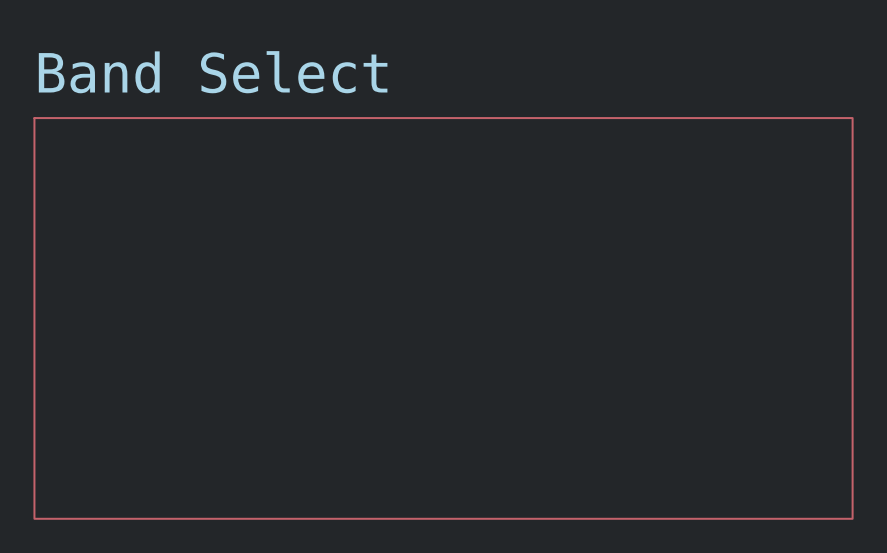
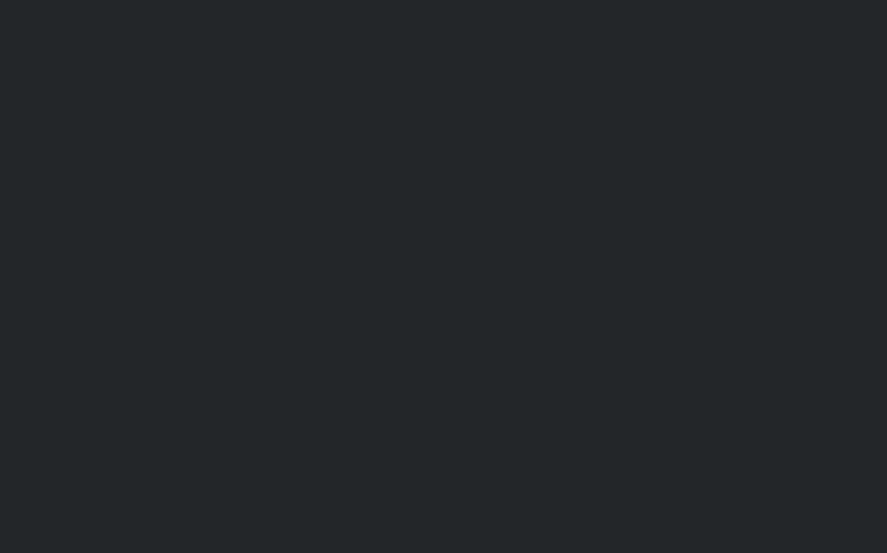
sheet Band Select: (443, 318) -> none

